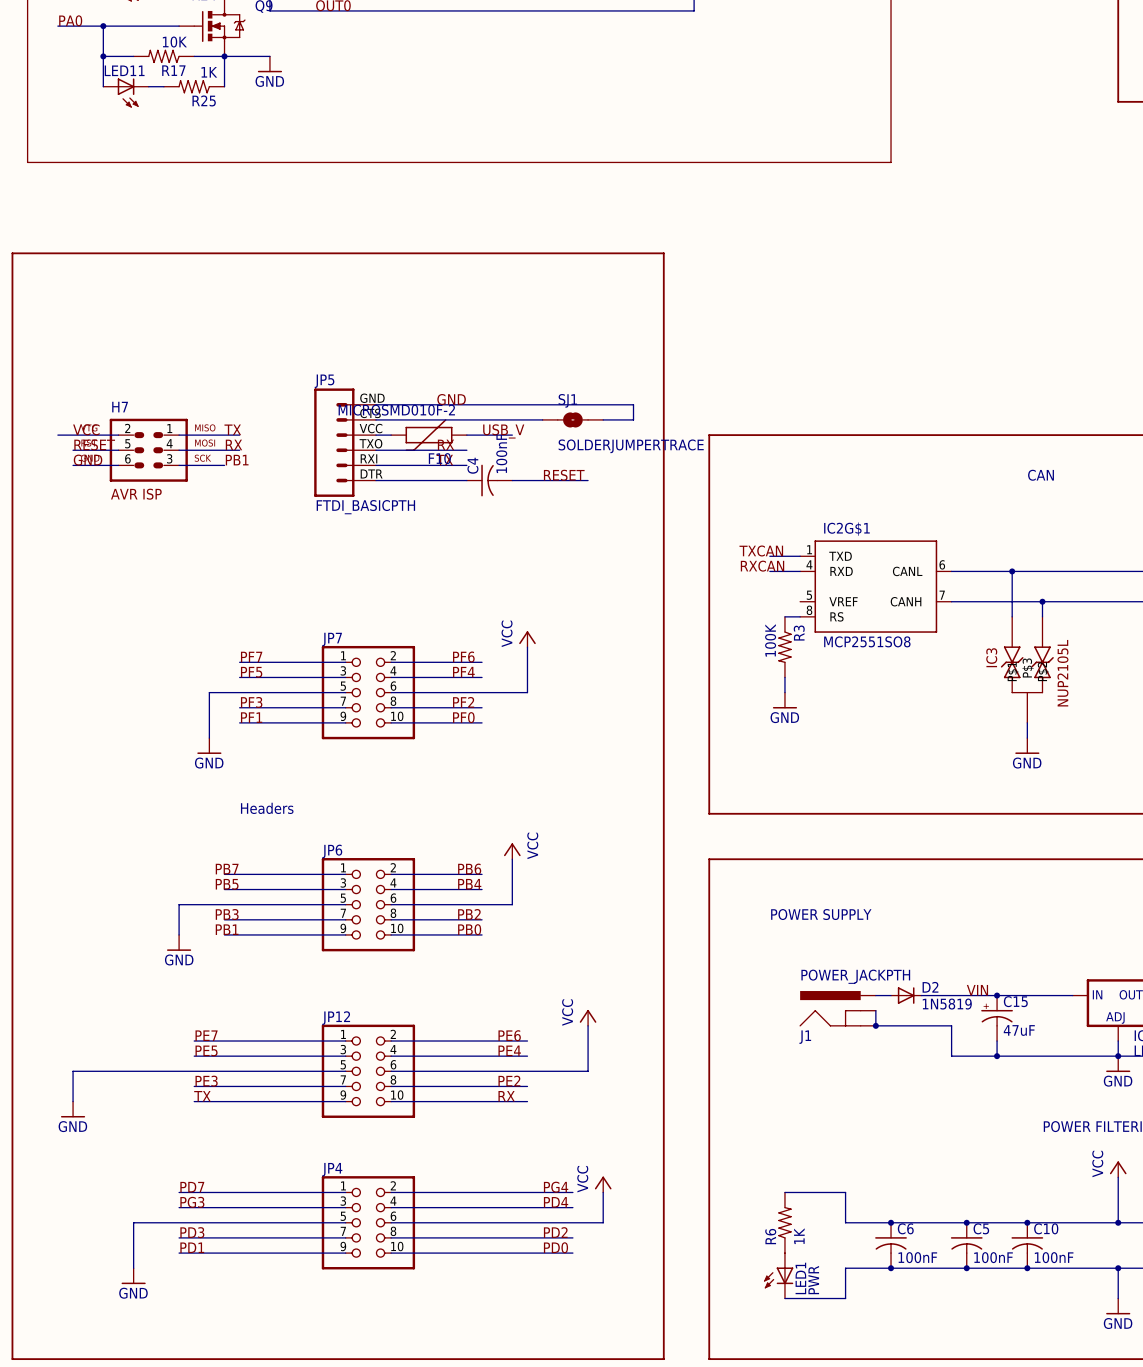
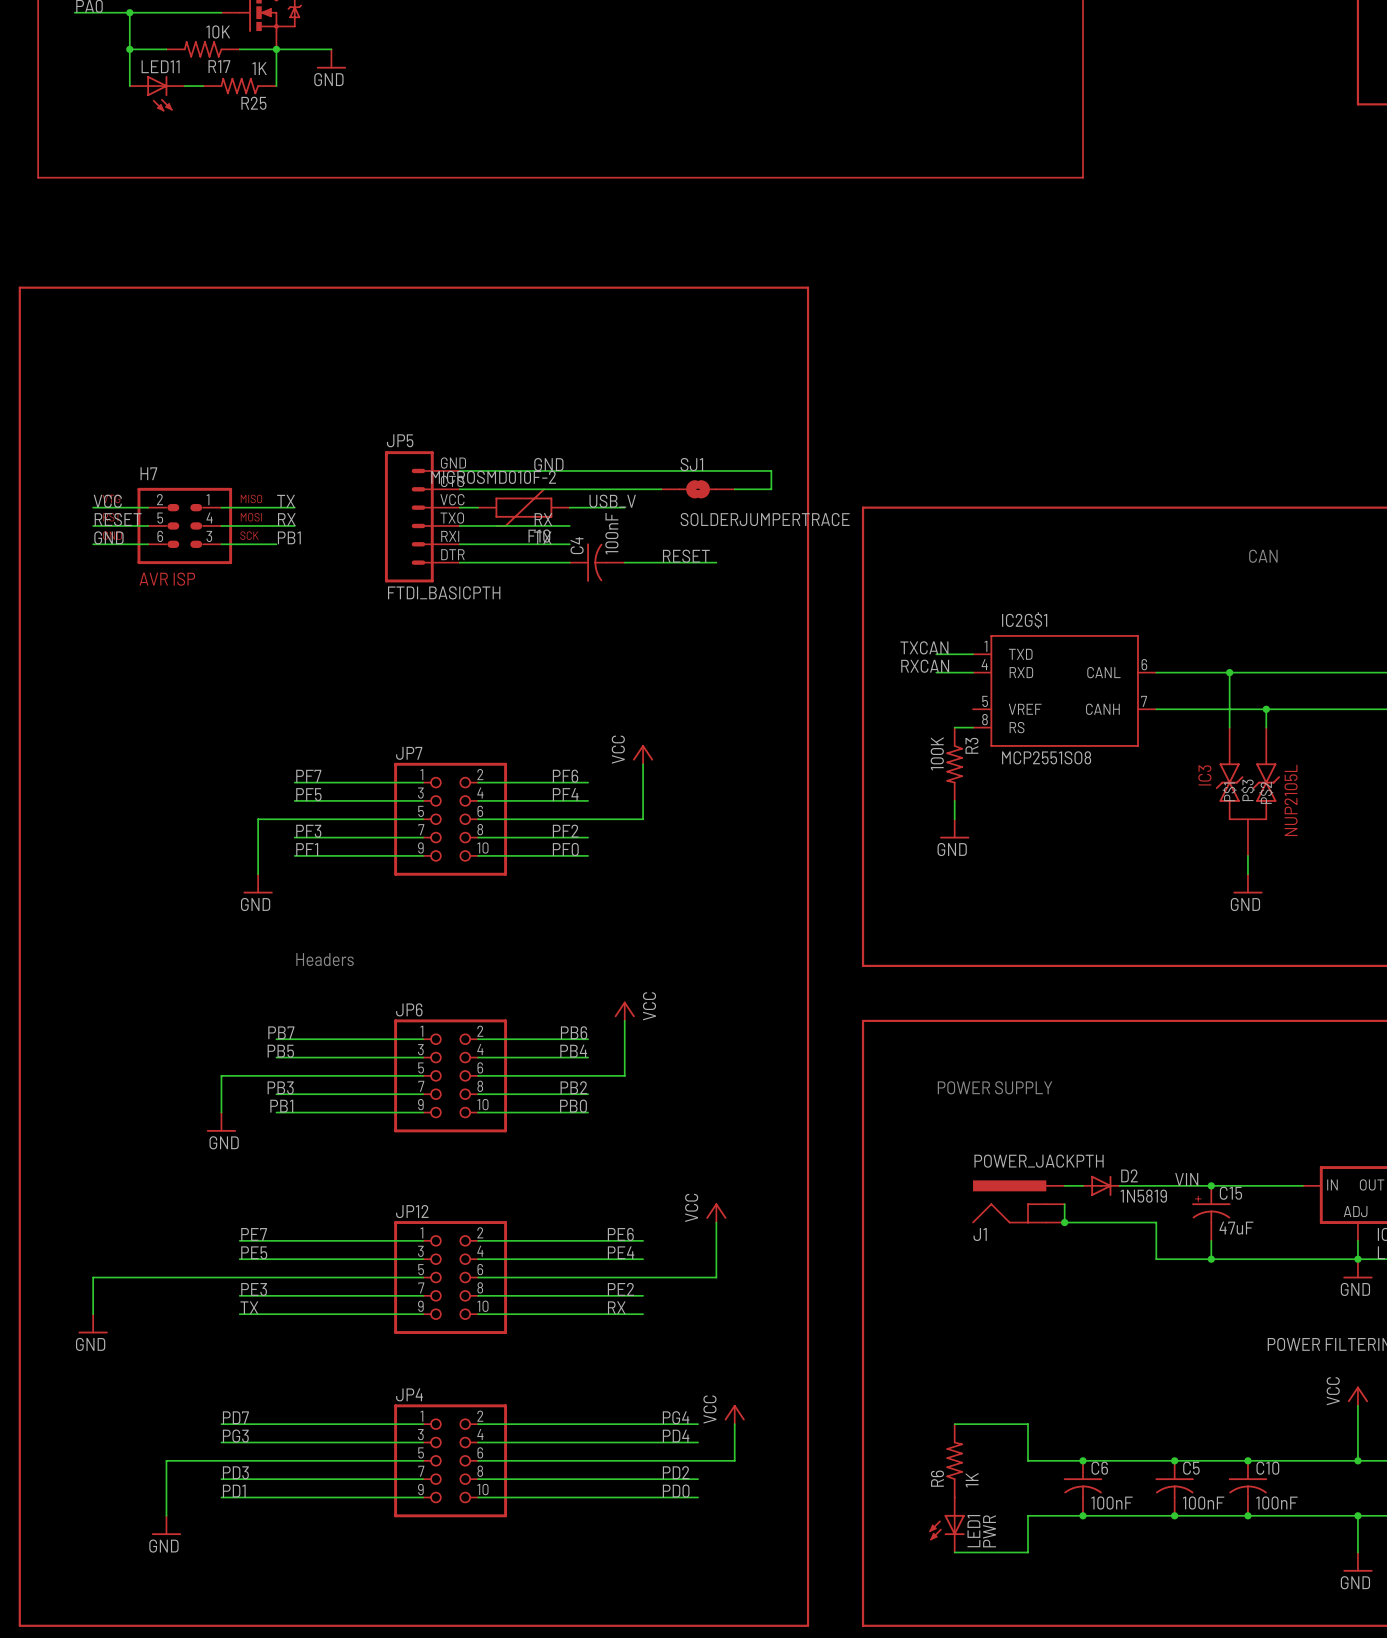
wire: (57, 435) (73, 435) -> none

